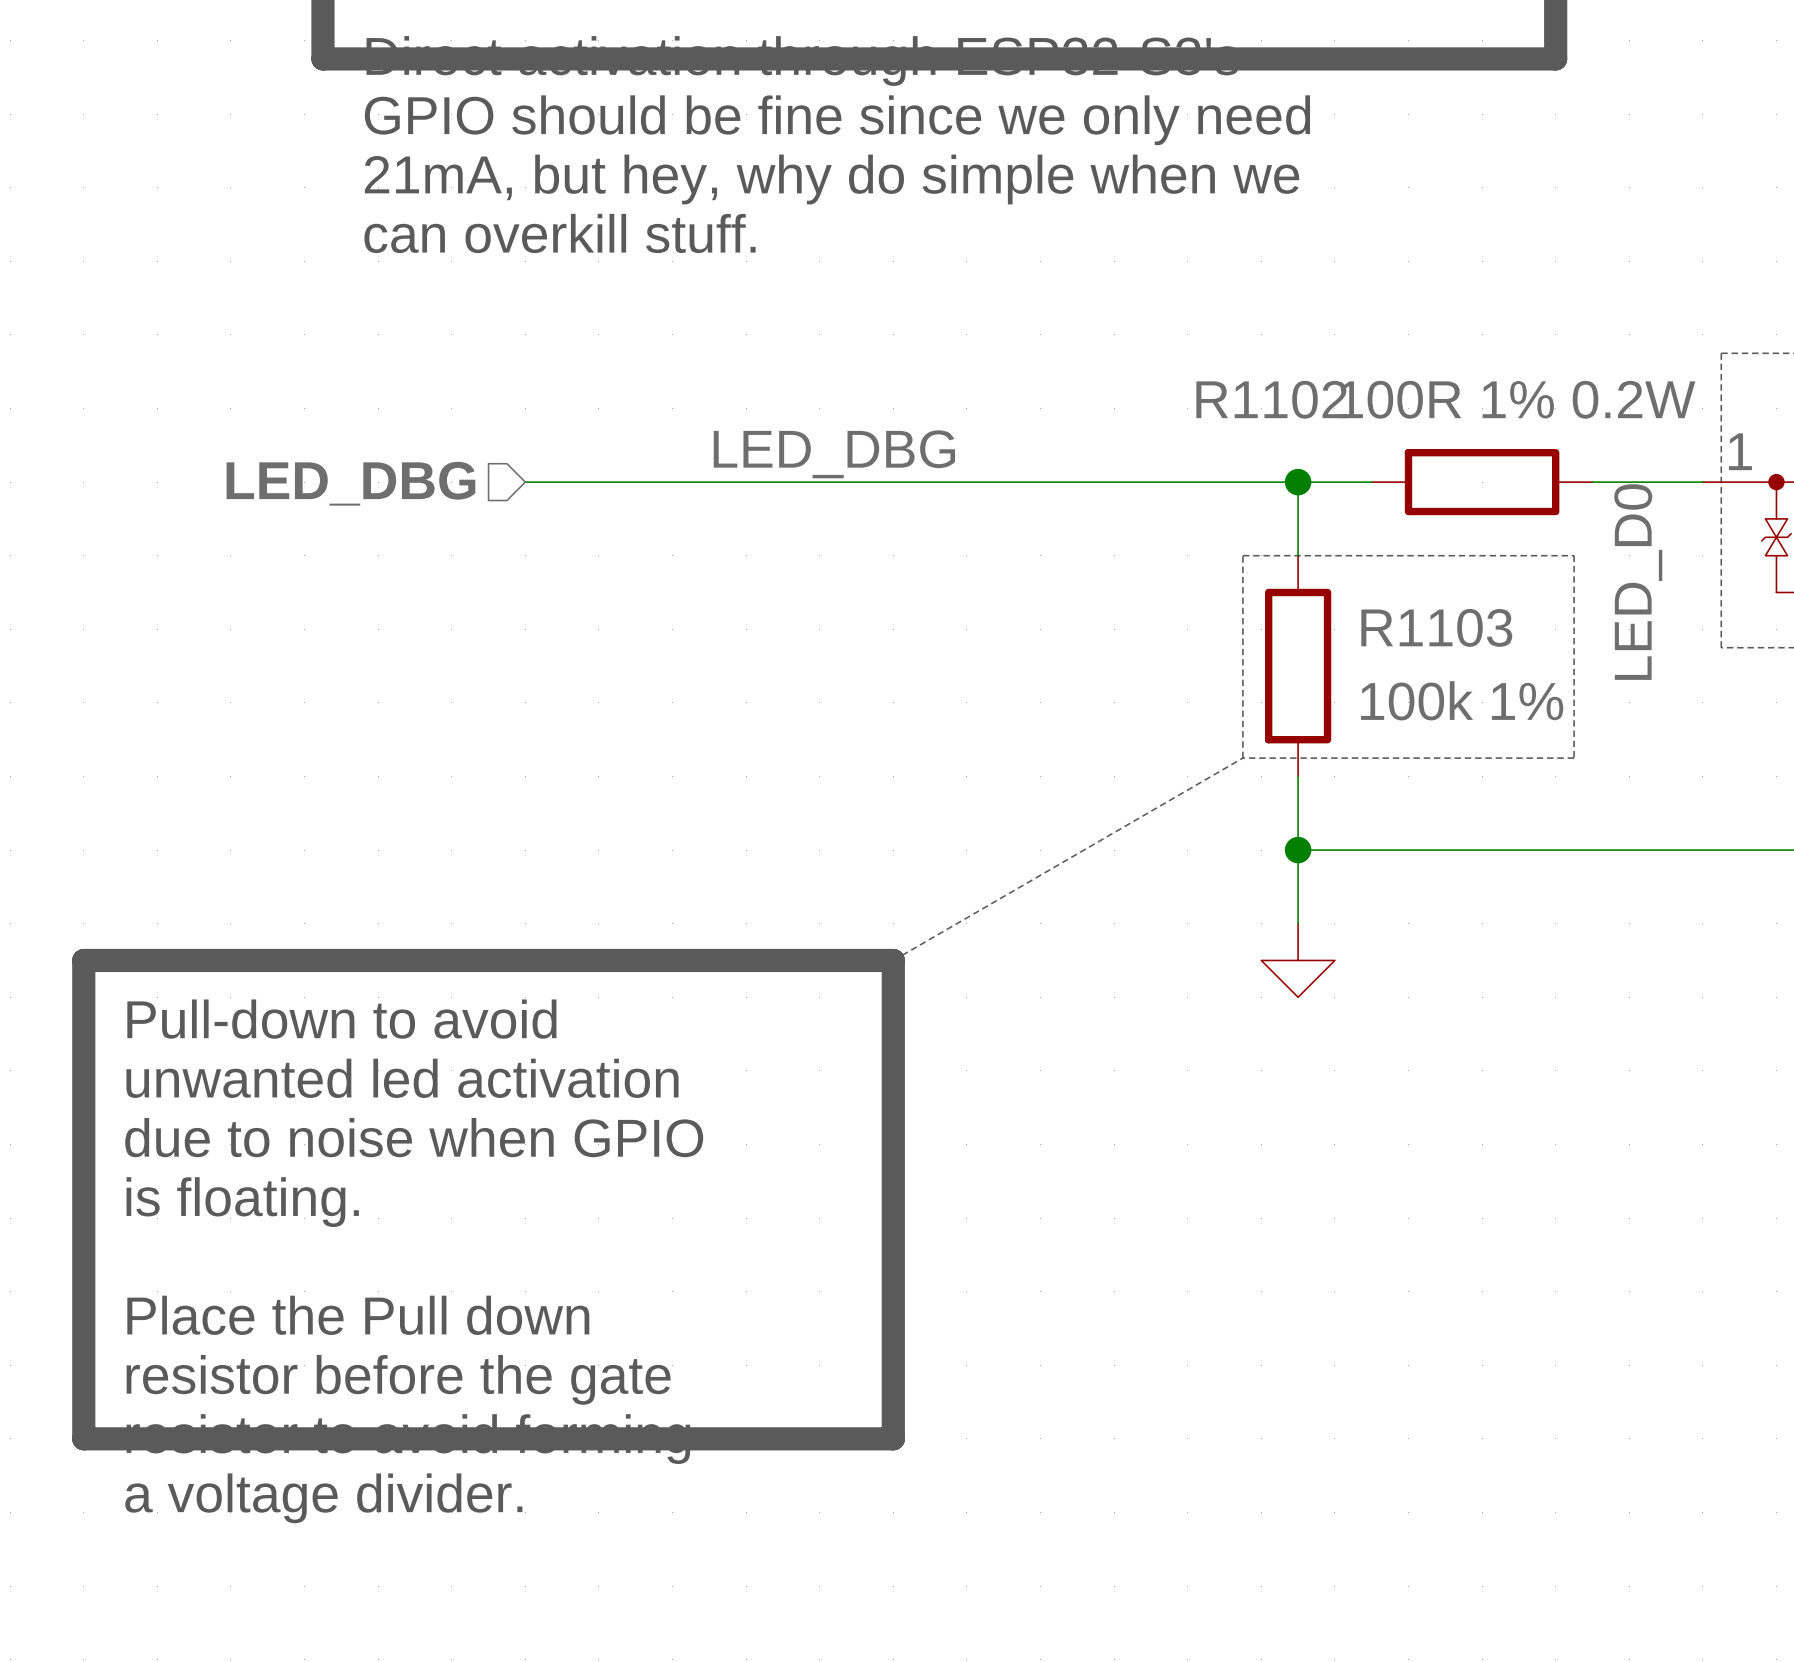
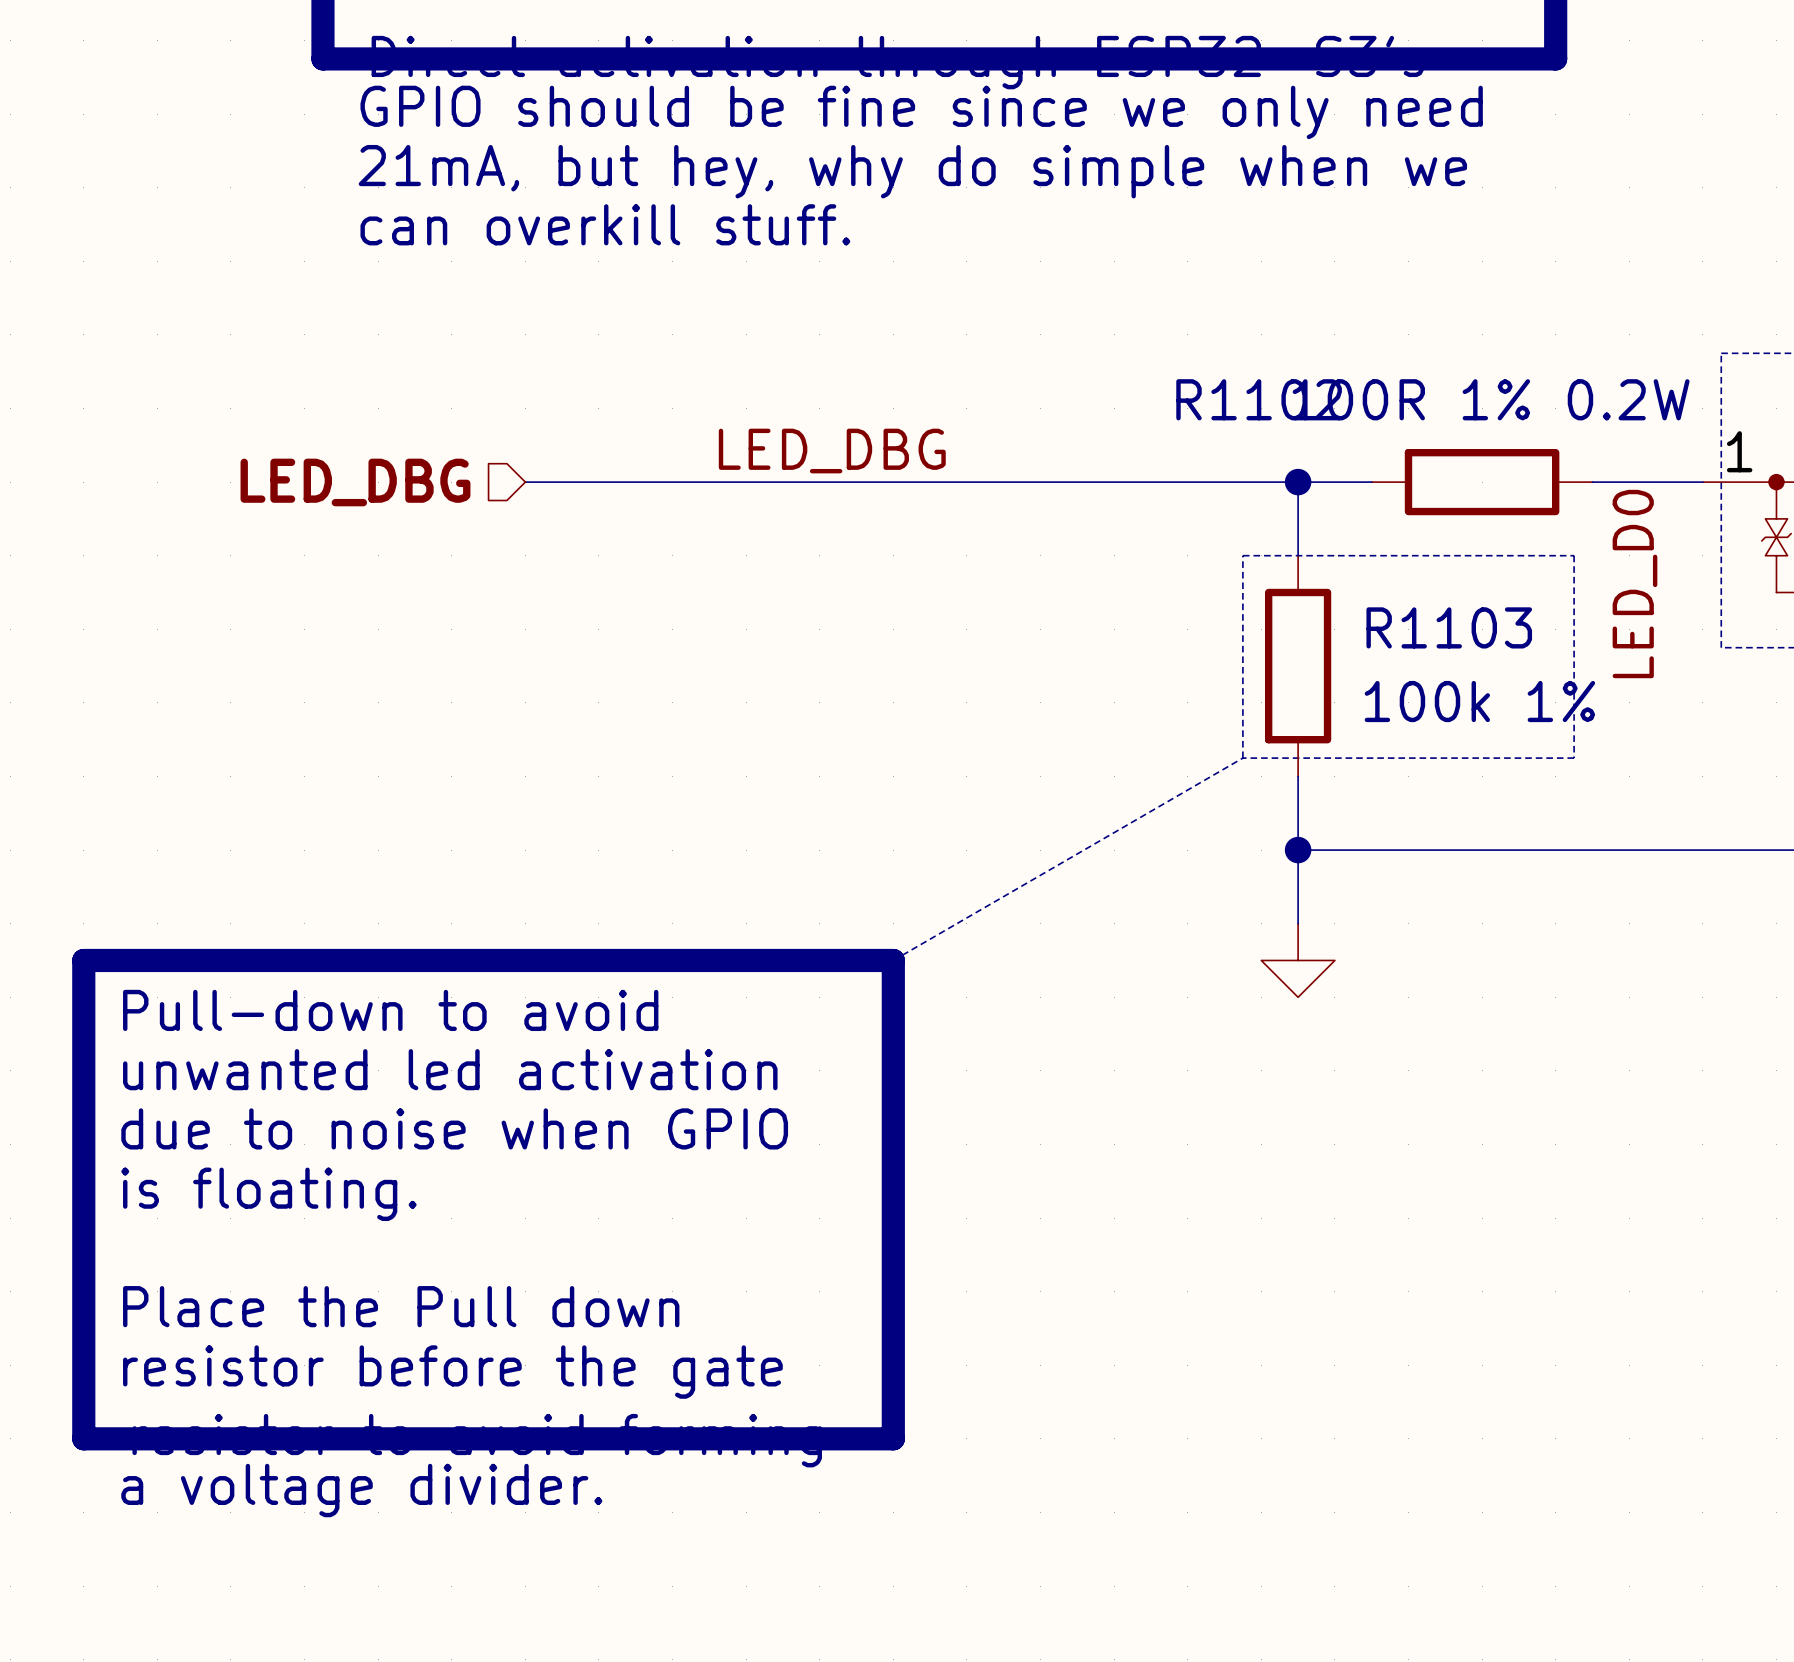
text position: GPIO should be fine since we only need (837, 120) -> GPIO should be fine since we only need (921, 112)
text position: 21mA, but hey, why do simple when we (832, 179) -> 21mA, but hey, why do simple when we (912, 171)
text position: can overkill stuff. (560, 233) -> can overkill stuff. (605, 224)
text position: Pull-down to avoid (341, 1019) -> Pull-down to avoid (390, 1010)
text position: unwanted led activation (402, 1078) -> unwanted led activation (450, 1069)
text position: due to noise when GPIO (414, 1137) -> due to noise when GPIO (454, 1128)
text position: is floating. (242, 1202) -> is floating. (268, 1194)
text position: Place the Pull down (358, 1315) -> Place the Pull down (401, 1306)
text position: resistor before the gate (398, 1379) -> resistor before the gate (452, 1372)
text position: a voltage divider. (323, 1498) -> a voltage divider. (361, 1490)

